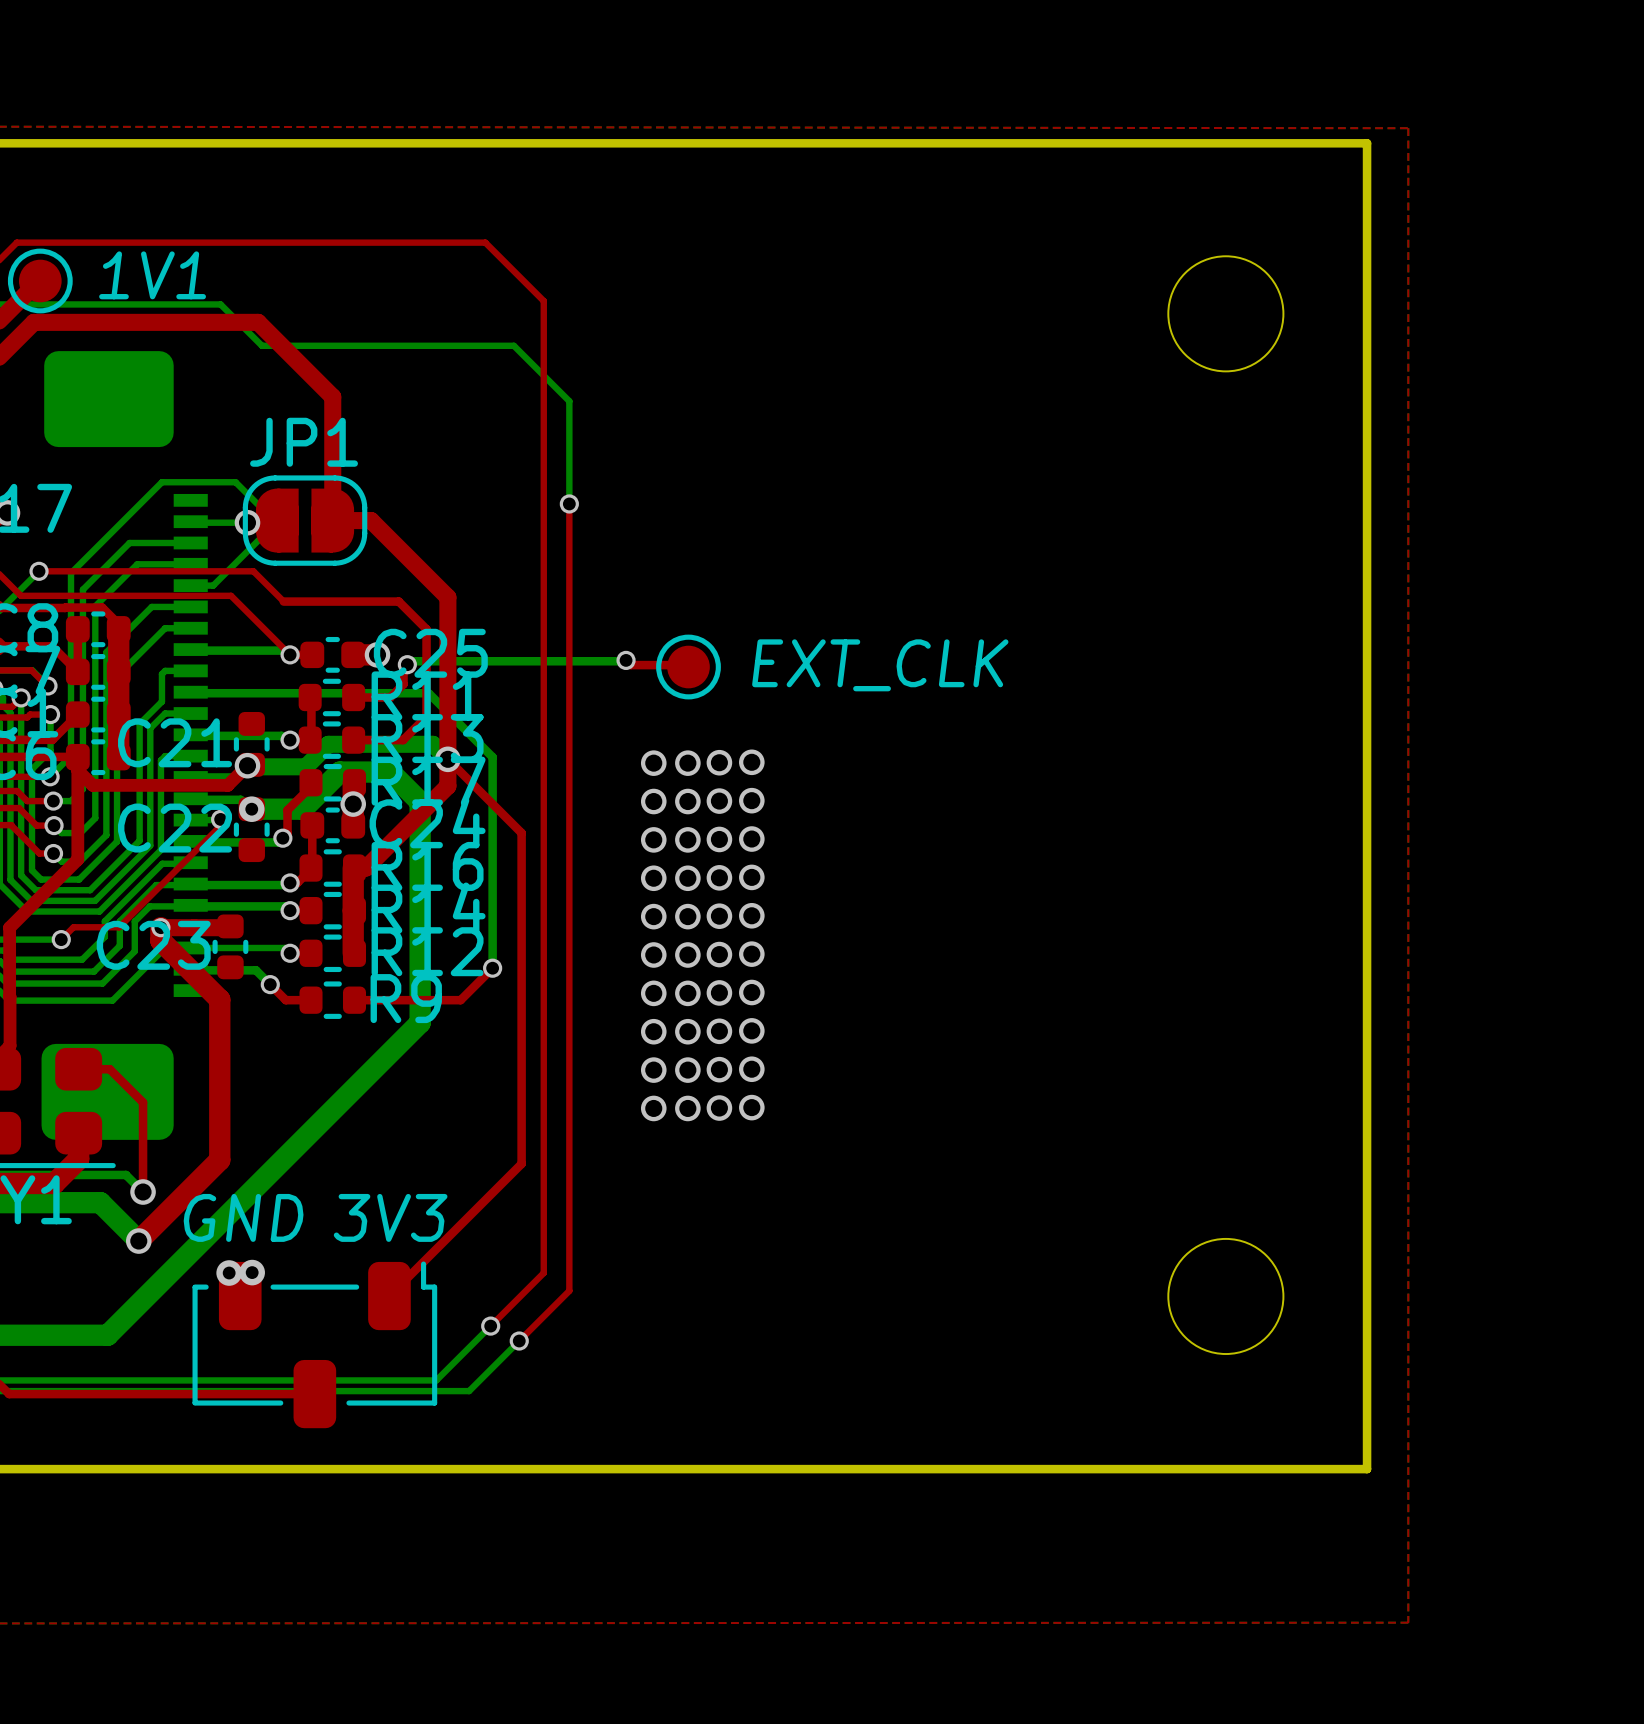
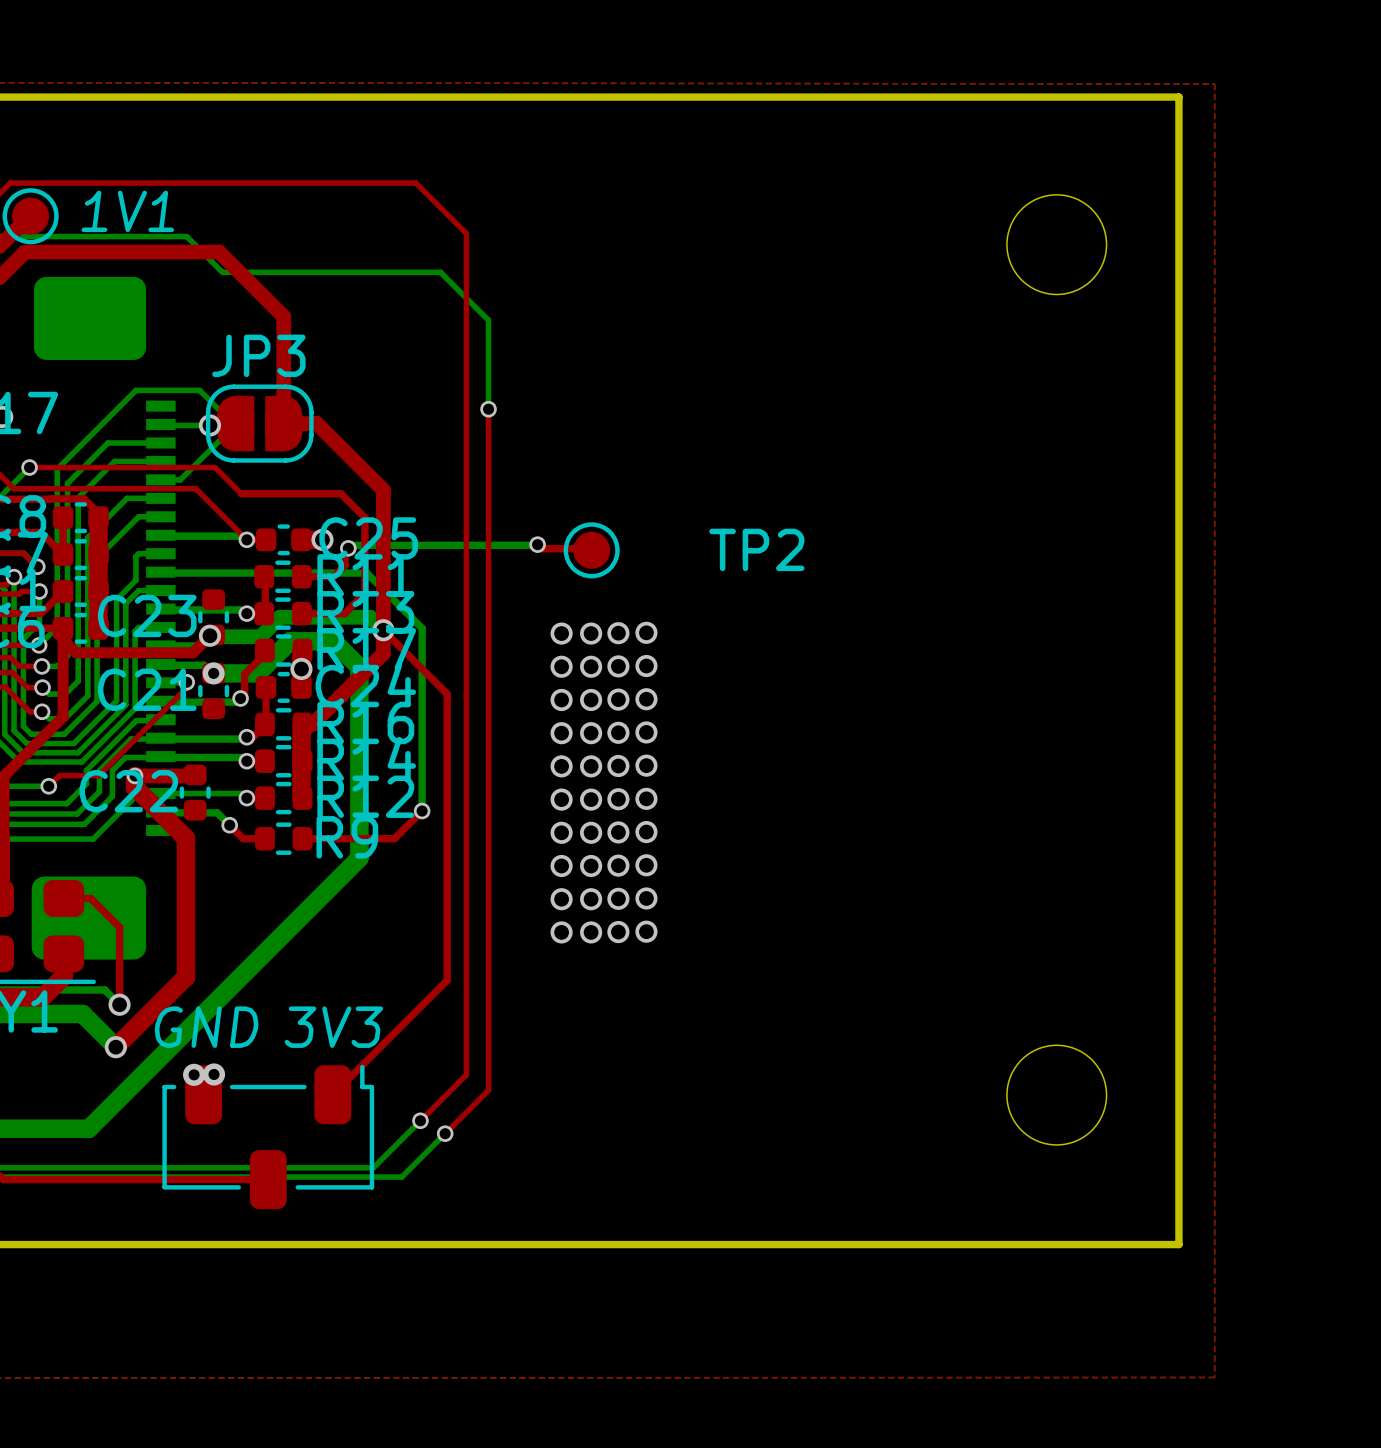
JP1 name: JP1 (304, 442) -> JP3 (258, 355)
text: EXT_CLK (880, 665) -> none
TP2 name: none -> TP2 (756, 549)
C21 name: C21 (175, 742) -> C23 (147, 615)
C22 name: C22 (175, 828) -> C21 (147, 689)
C23 name: C23 (153, 945) -> C22 (128, 791)

